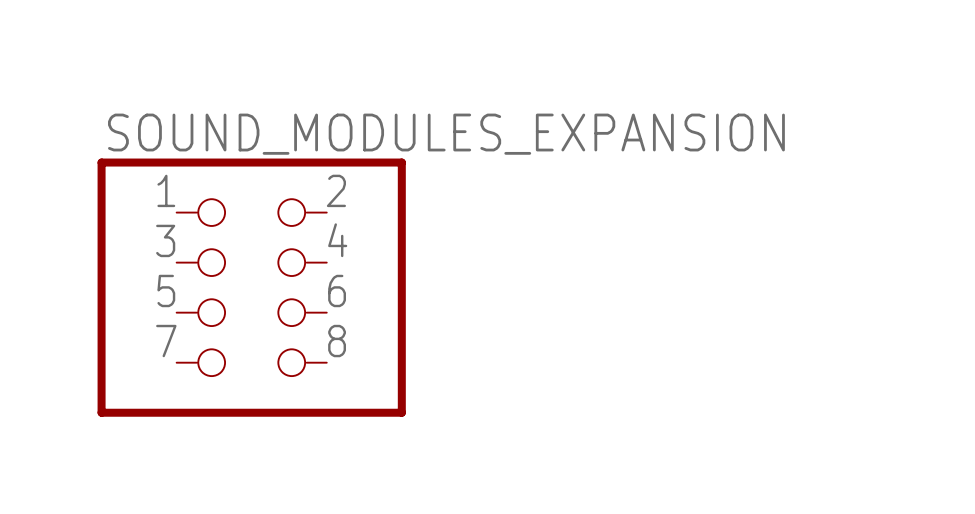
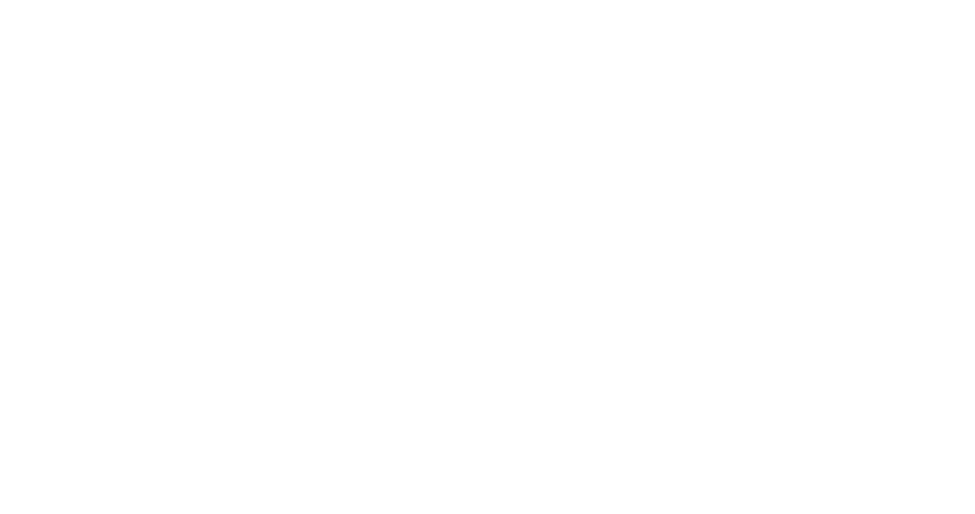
SOUND_MODULES_EXPANSION: (251, 287) -> none

